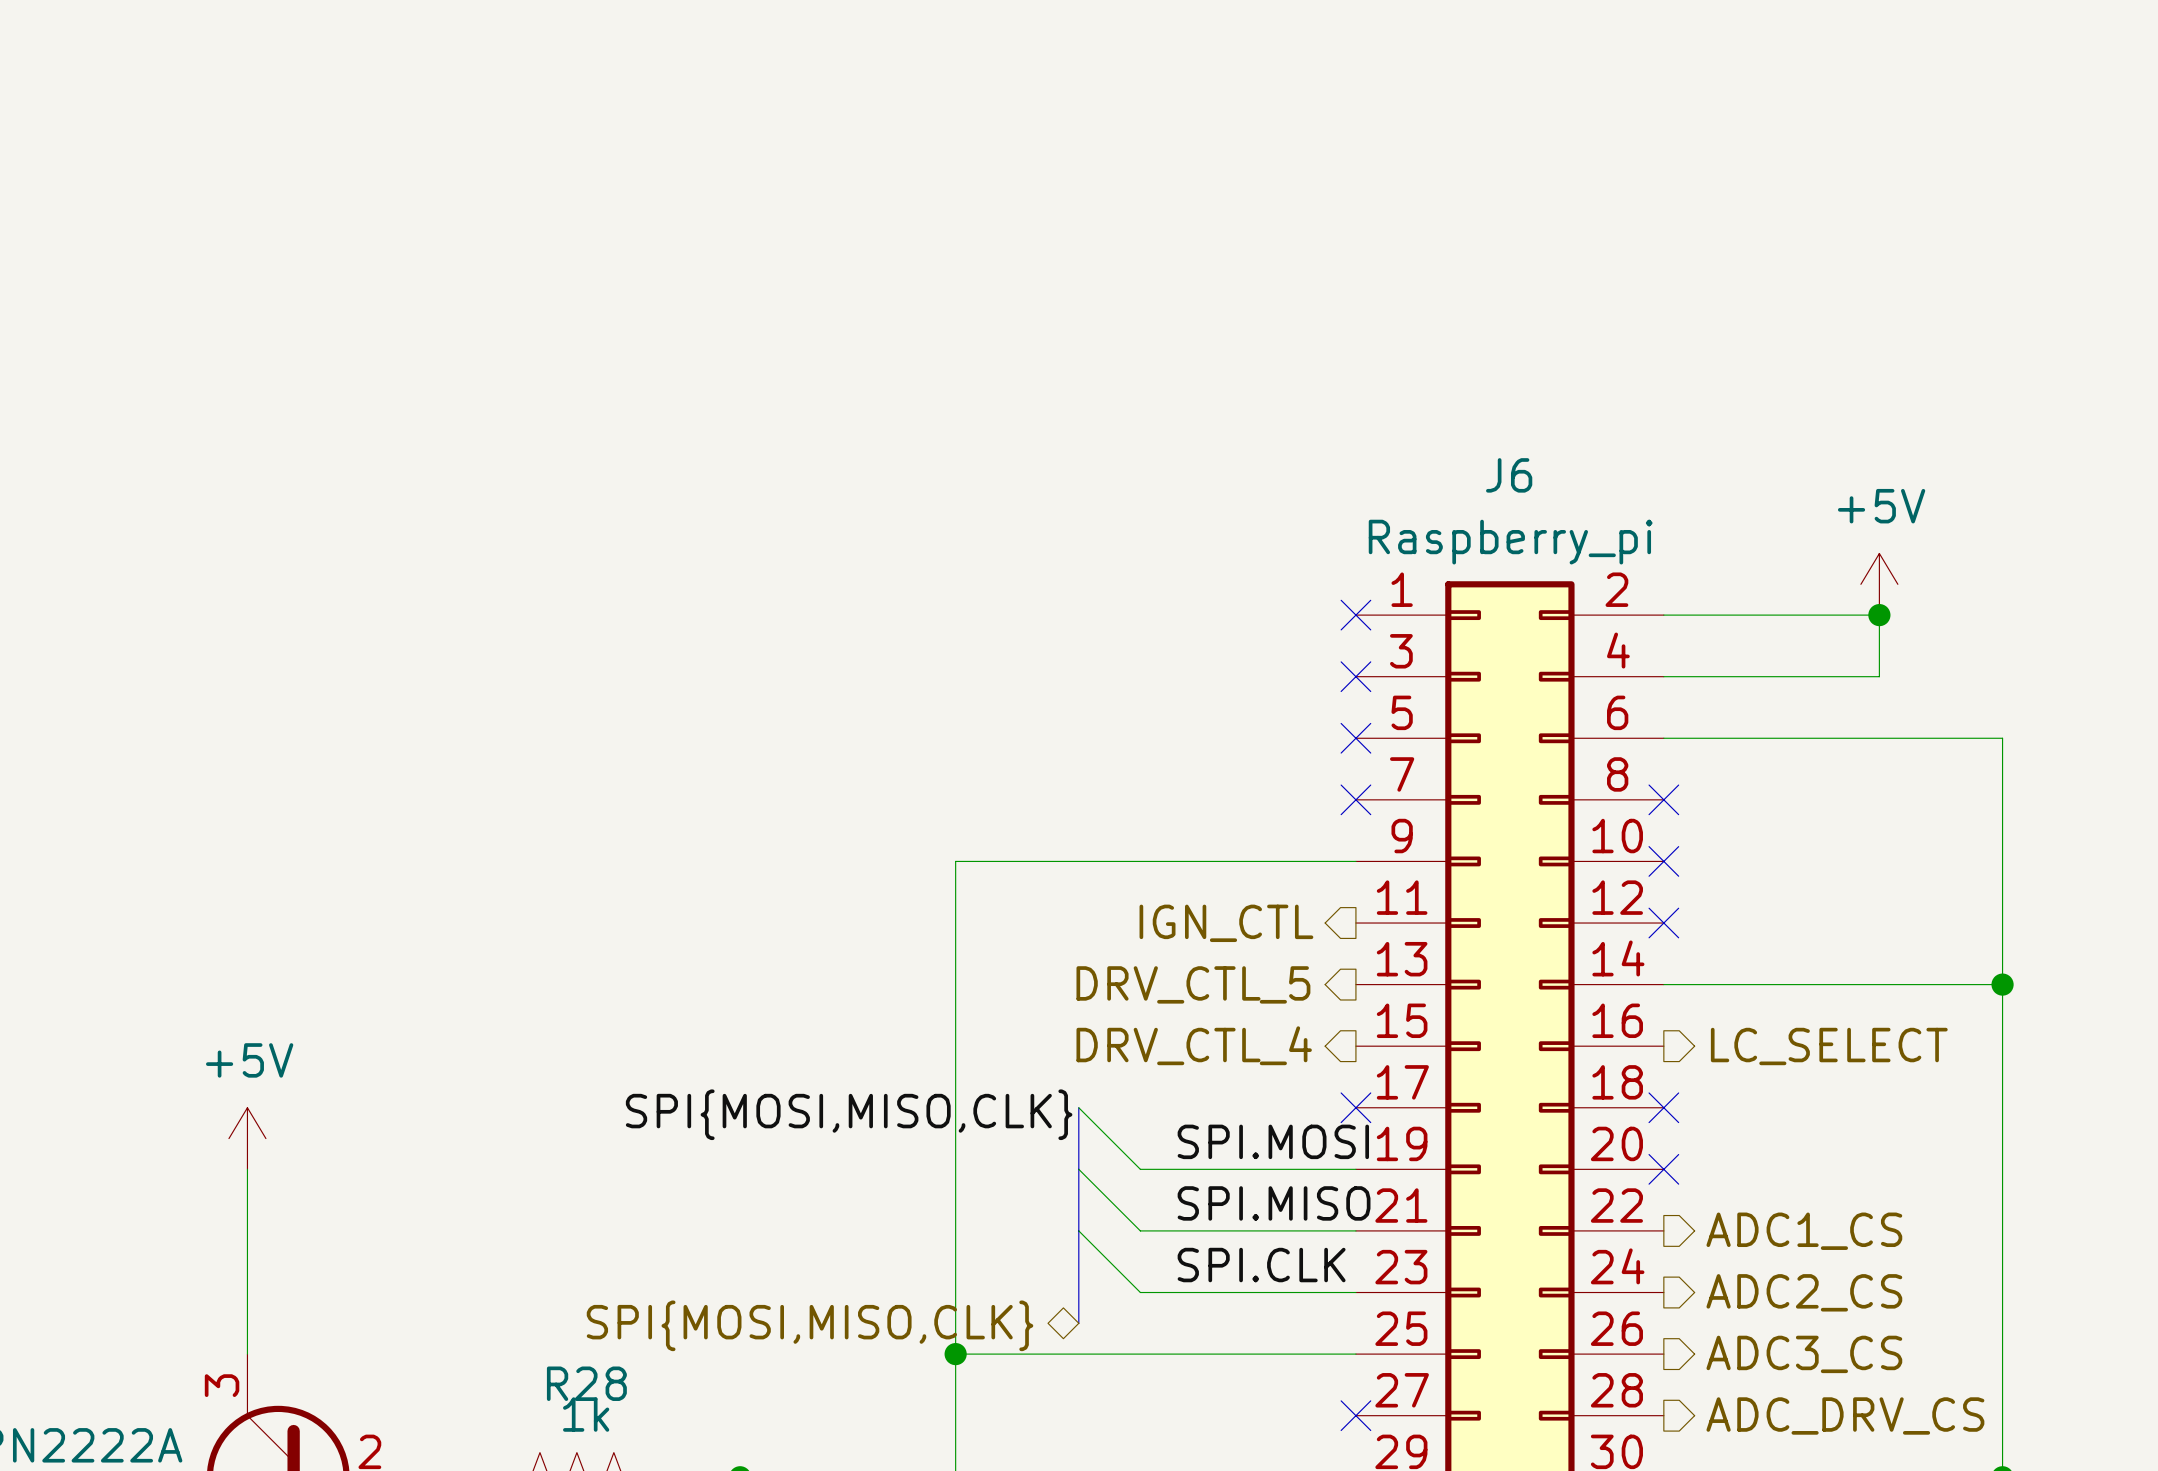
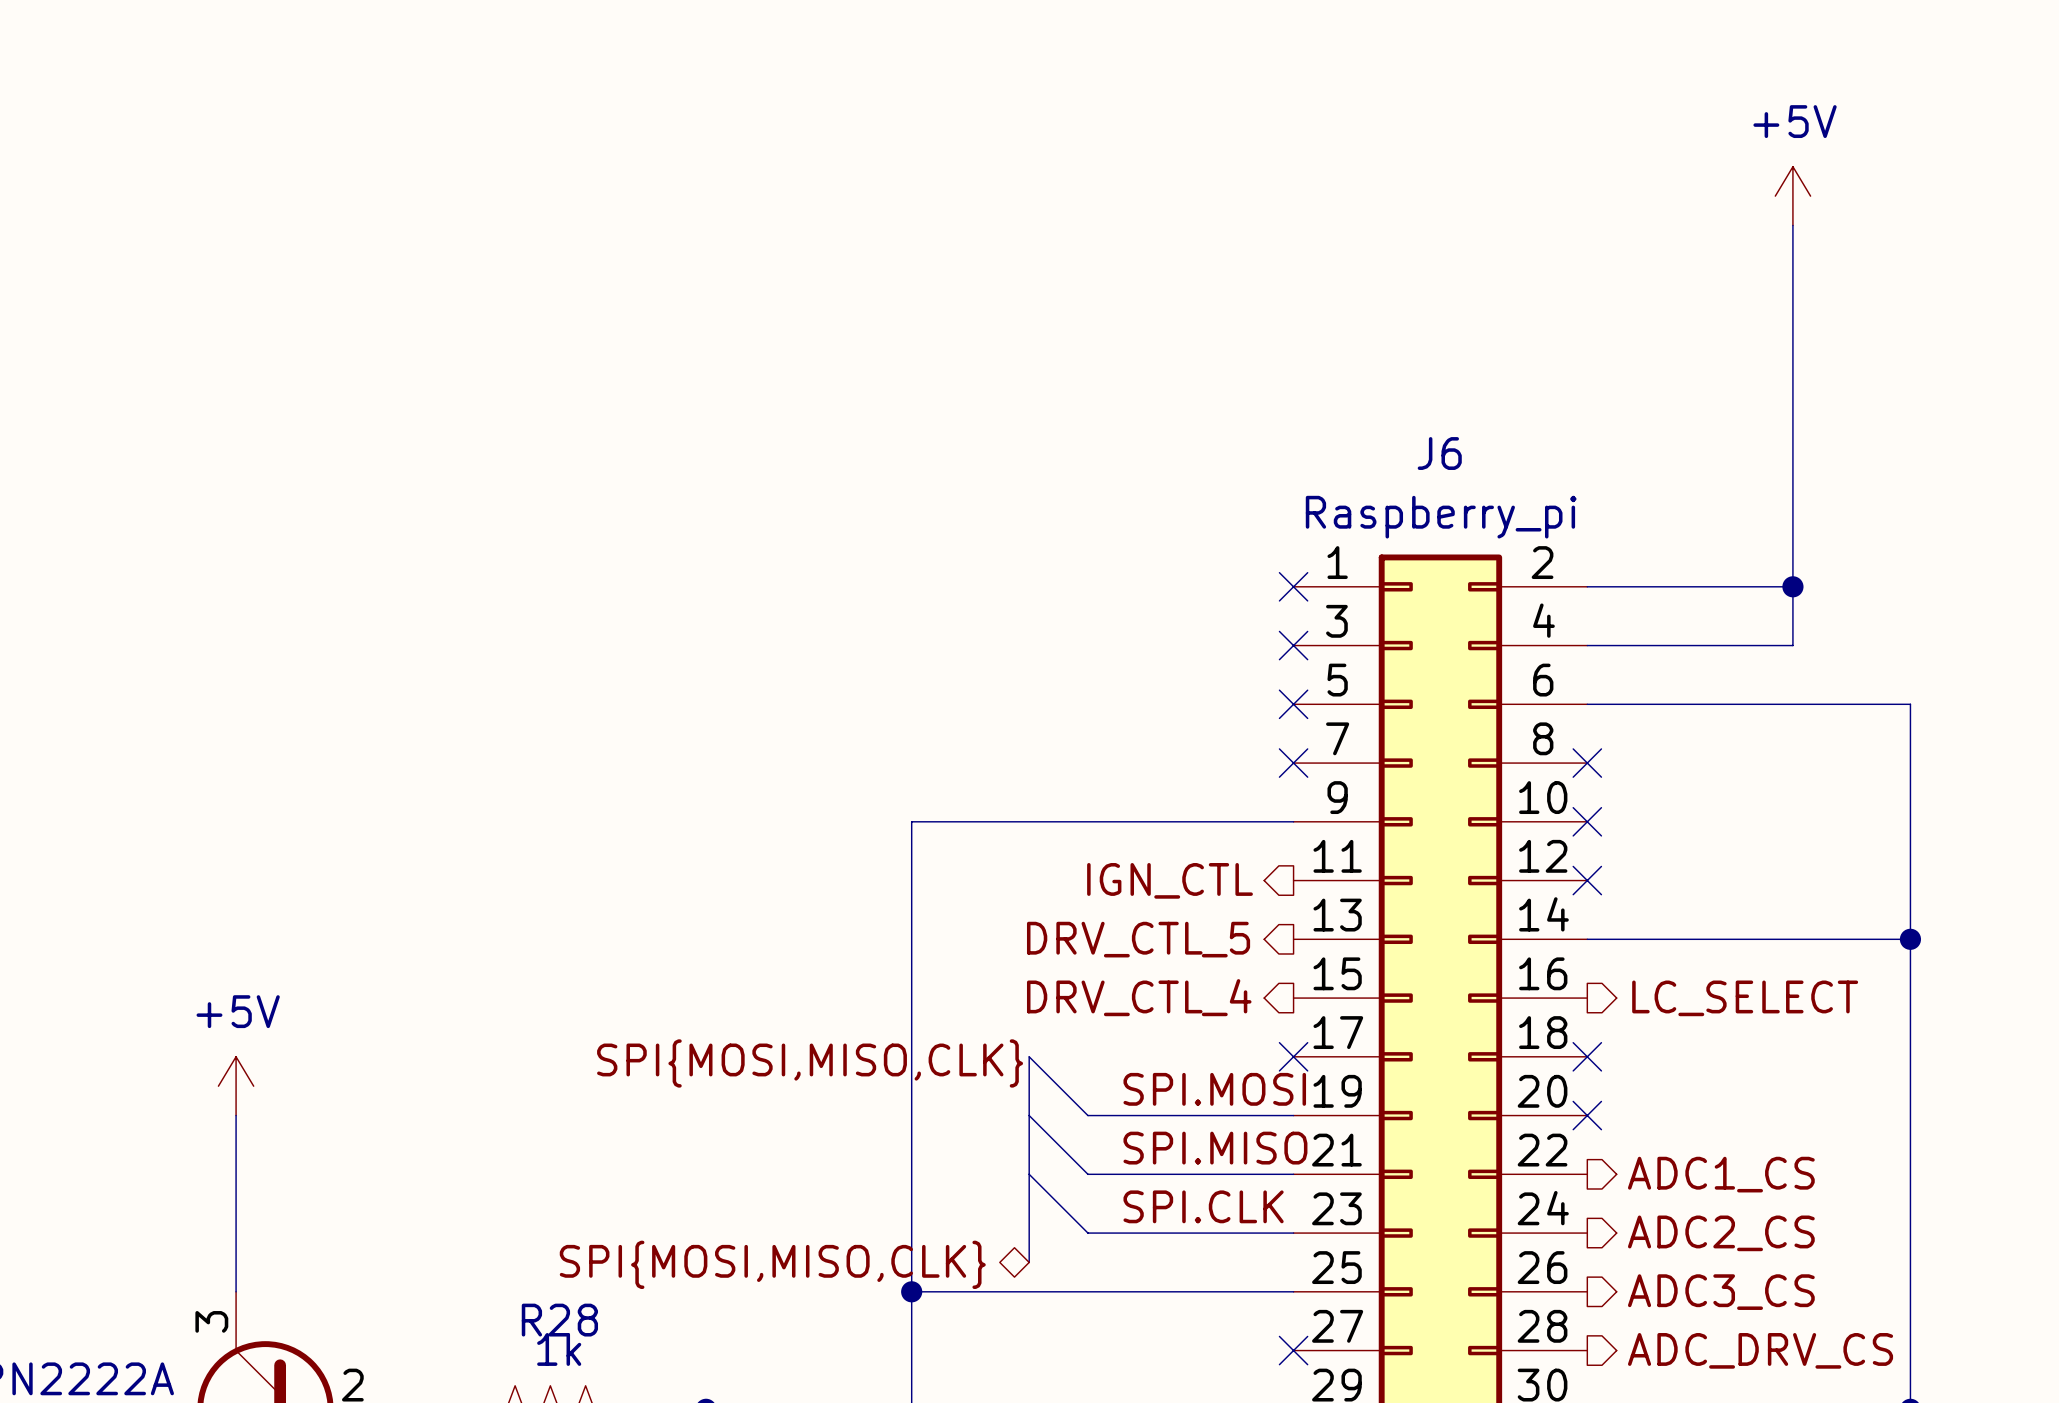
wire: none -> (1792, 225) (1792, 586)
power symbol position: +5V (1879, 584) -> +5V (1792, 196)

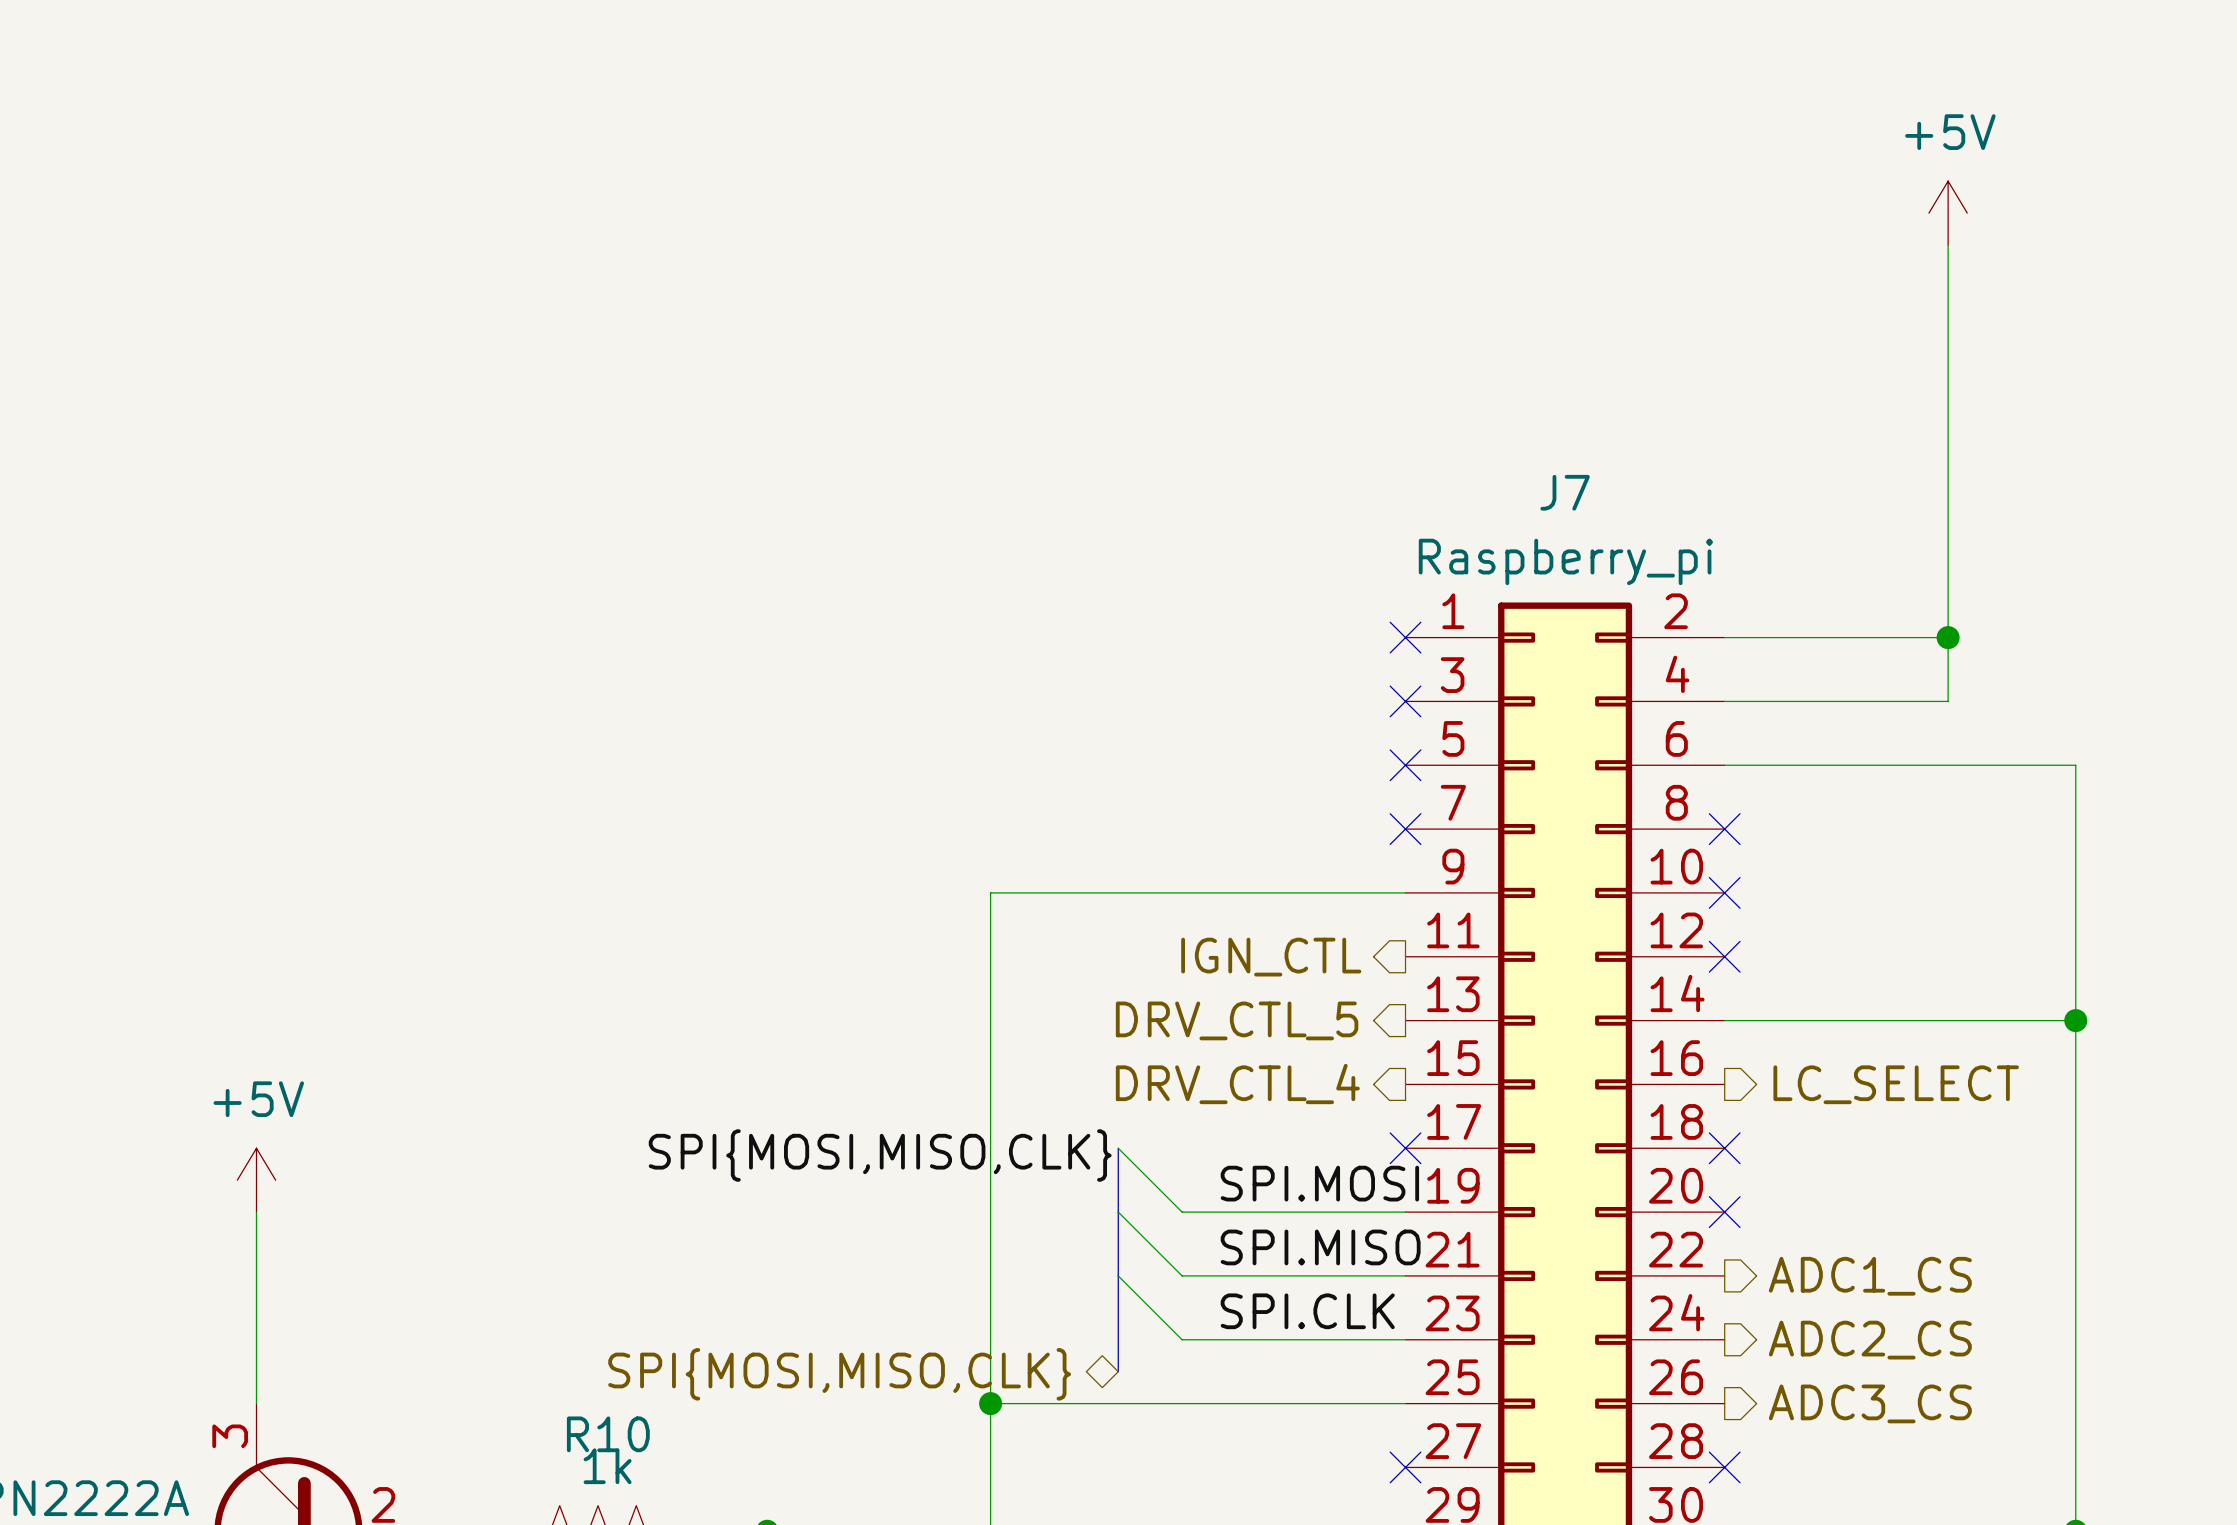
J6 name: J6 (1439, 453) -> J7 (1565, 492)
R28 name: R28 (559, 1320) -> R10 (608, 1434)
no-connect mark: none -> (1724, 1467)
hierarchical label: ADC_DRV_CS (1760, 1350) -> none

